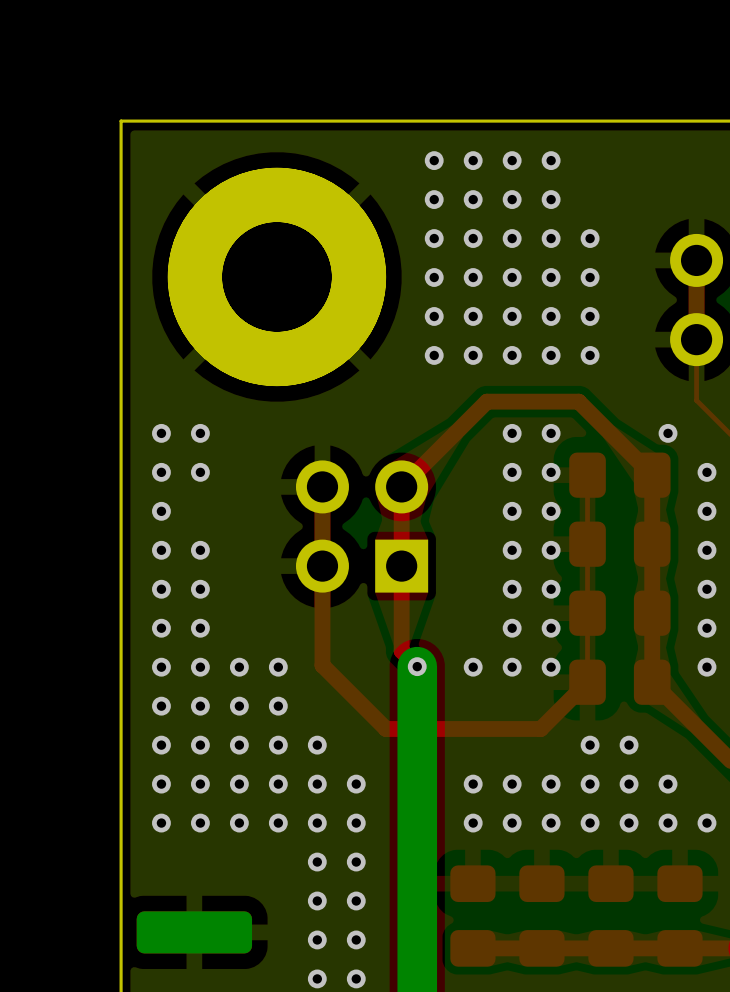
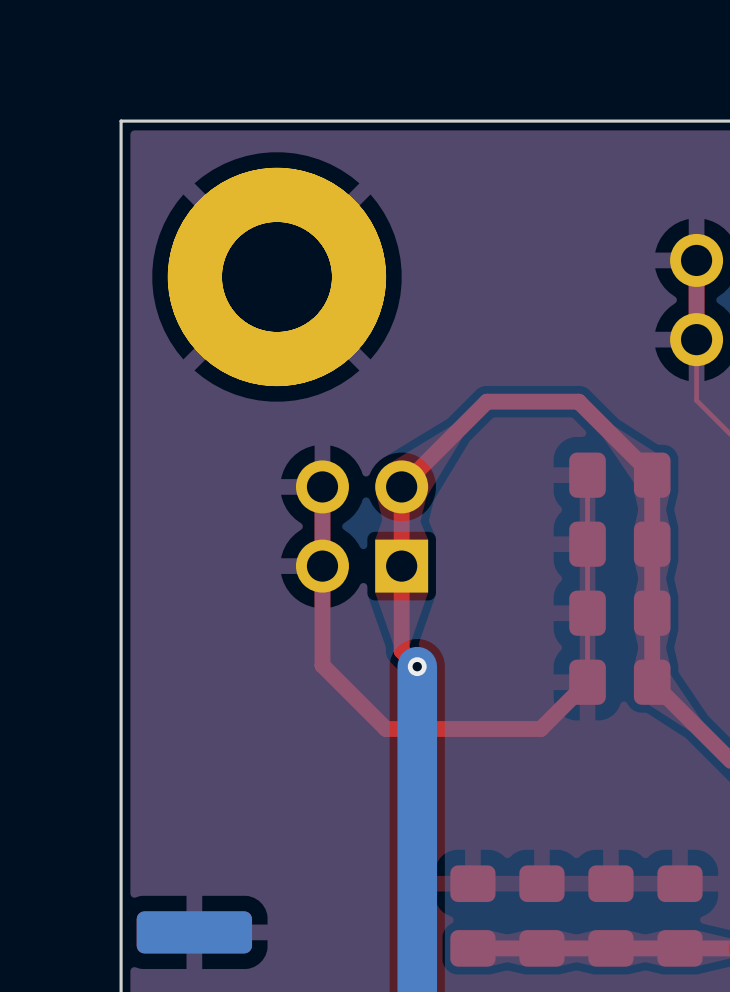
via: (434, 160) -> none
via: (473, 160) -> none
via: (512, 160) -> none
via: (551, 160) -> none
via: (434, 199) -> none
via: (473, 199) -> none
via: (512, 199) -> none
via: (551, 199) -> none
via: (434, 238) -> none
via: (473, 238) -> none
via: (512, 238) -> none
via: (551, 238) -> none
via: (590, 238) -> none
via: (434, 277) -> none
via: (473, 277) -> none
via: (512, 277) -> none
via: (551, 277) -> none
via: (590, 277) -> none
via: (434, 316) -> none
via: (473, 316) -> none
via: (512, 316) -> none
via: (551, 316) -> none
via: (590, 316) -> none
via: (434, 355) -> none
via: (473, 355) -> none
via: (512, 355) -> none
via: (551, 355) -> none
via: (590, 355) -> none
via: (161, 433) -> none
via: (200, 433) -> none
via: (512, 433) -> none
via: (551, 433) -> none
via: (668, 433) -> none
via: (161, 472) -> none
via: (200, 472) -> none
via: (512, 472) -> none
via: (551, 472) -> none
via: (707, 472) -> none
via: (161, 511) -> none
via: (512, 511) -> none
via: (551, 511) -> none
via: (707, 511) -> none
via: (161, 550) -> none
via: (200, 550) -> none
via: (512, 550) -> none
via: (551, 550) -> none
via: (707, 550) -> none
via: (161, 589) -> none
via: (200, 589) -> none
via: (512, 589) -> none
via: (551, 589) -> none
via: (707, 589) -> none
via: (161, 628) -> none
via: (200, 628) -> none
via: (512, 628) -> none
via: (551, 628) -> none
via: (707, 628) -> none
via: (161, 667) -> none
via: (200, 667) -> none
via: (239, 667) -> none
via: (278, 667) -> none
via: (473, 667) -> none
via: (512, 667) -> none
via: (551, 667) -> none
via: (707, 667) -> none
via: (161, 706) -> none
via: (200, 706) -> none
via: (239, 706) -> none
via: (278, 706) -> none
via: (161, 745) -> none
via: (200, 745) -> none
via: (239, 745) -> none
via: (278, 745) -> none
via: (317, 745) -> none
via: (590, 745) -> none
via: (629, 745) -> none
via: (161, 784) -> none
via: (200, 784) -> none
via: (239, 784) -> none
via: (278, 784) -> none
via: (317, 784) -> none
via: (356, 784) -> none
via: (473, 784) -> none
via: (512, 784) -> none
via: (551, 784) -> none
via: (590, 784) -> none
via: (629, 784) -> none
via: (668, 784) -> none
via: (161, 823) -> none
via: (200, 823) -> none
via: (239, 823) -> none
via: (278, 823) -> none
via: (317, 823) -> none
via: (356, 823) -> none
via: (473, 823) -> none
via: (512, 823) -> none
via: (551, 823) -> none
via: (590, 823) -> none
via: (629, 823) -> none
via: (668, 823) -> none
via: (707, 823) -> none
via: (317, 862) -> none
via: (356, 862) -> none
via: (317, 900) -> none
via: (356, 900) -> none
via: (317, 939) -> none
via: (356, 939) -> none
via: (317, 978) -> none
via: (356, 978) -> none

